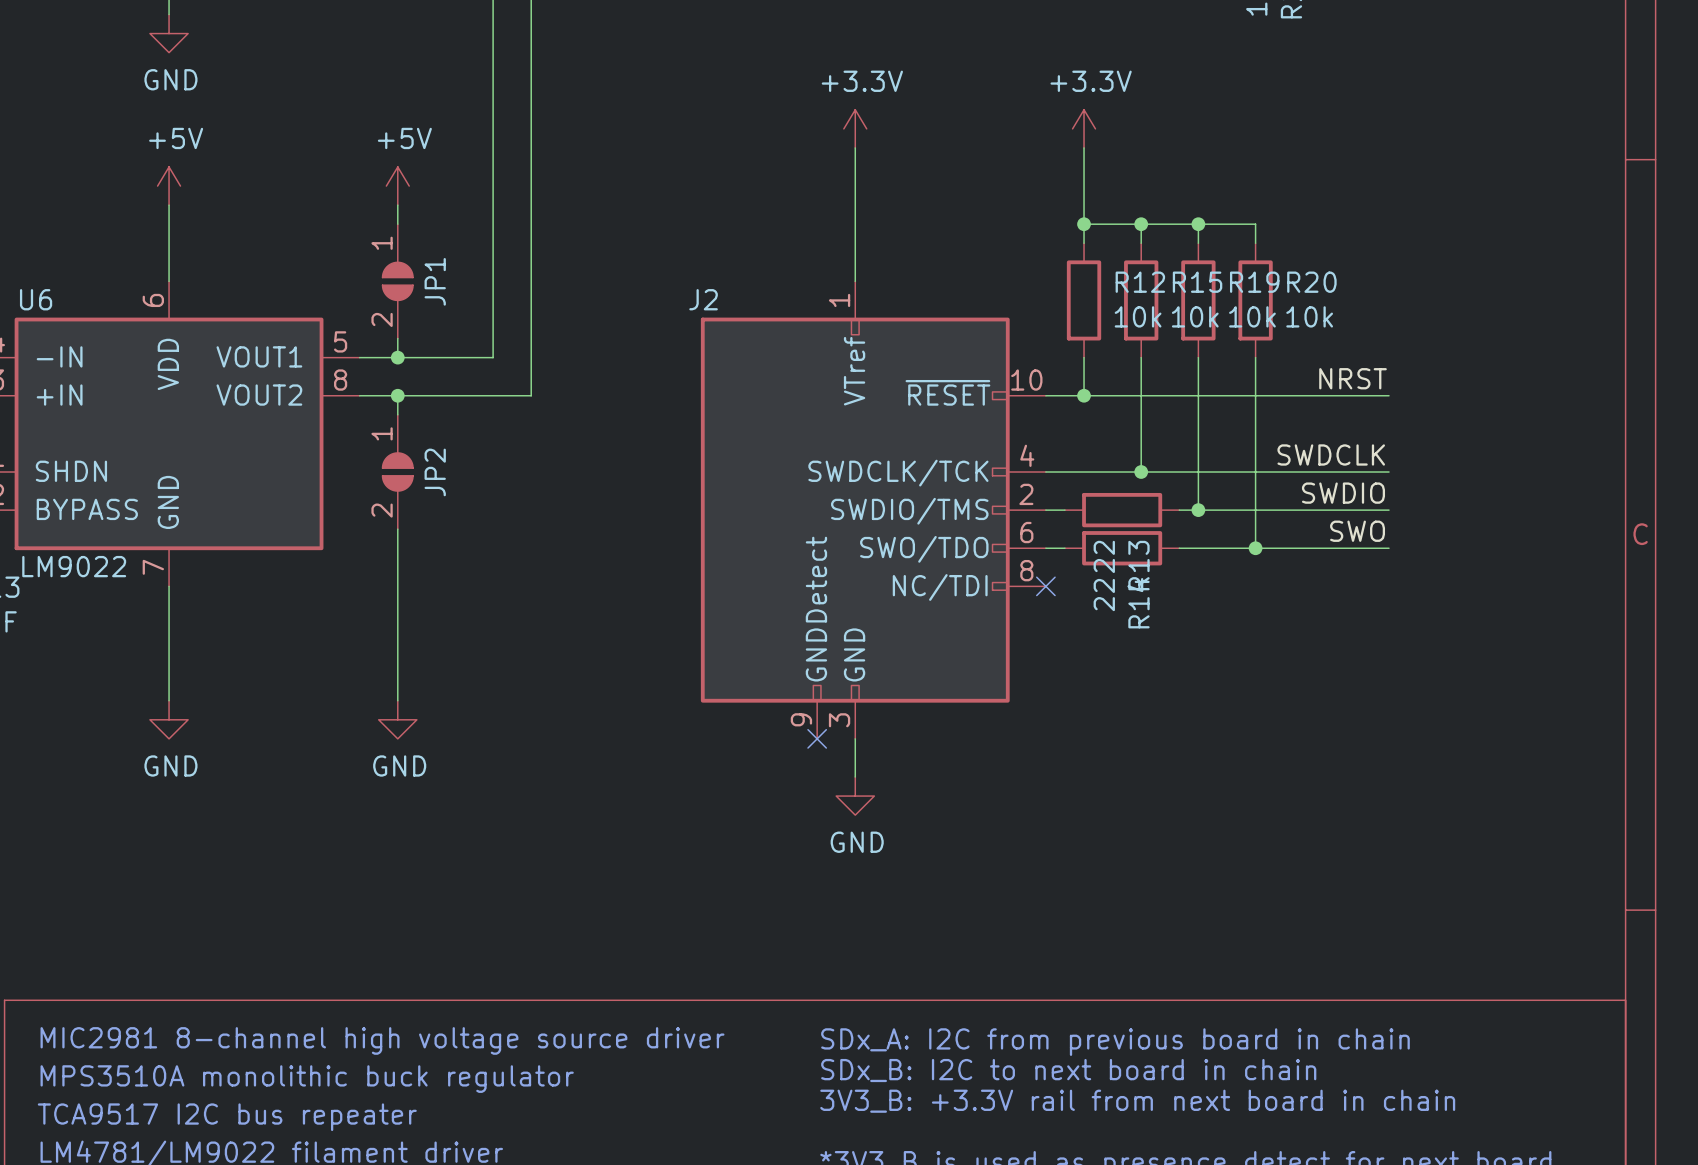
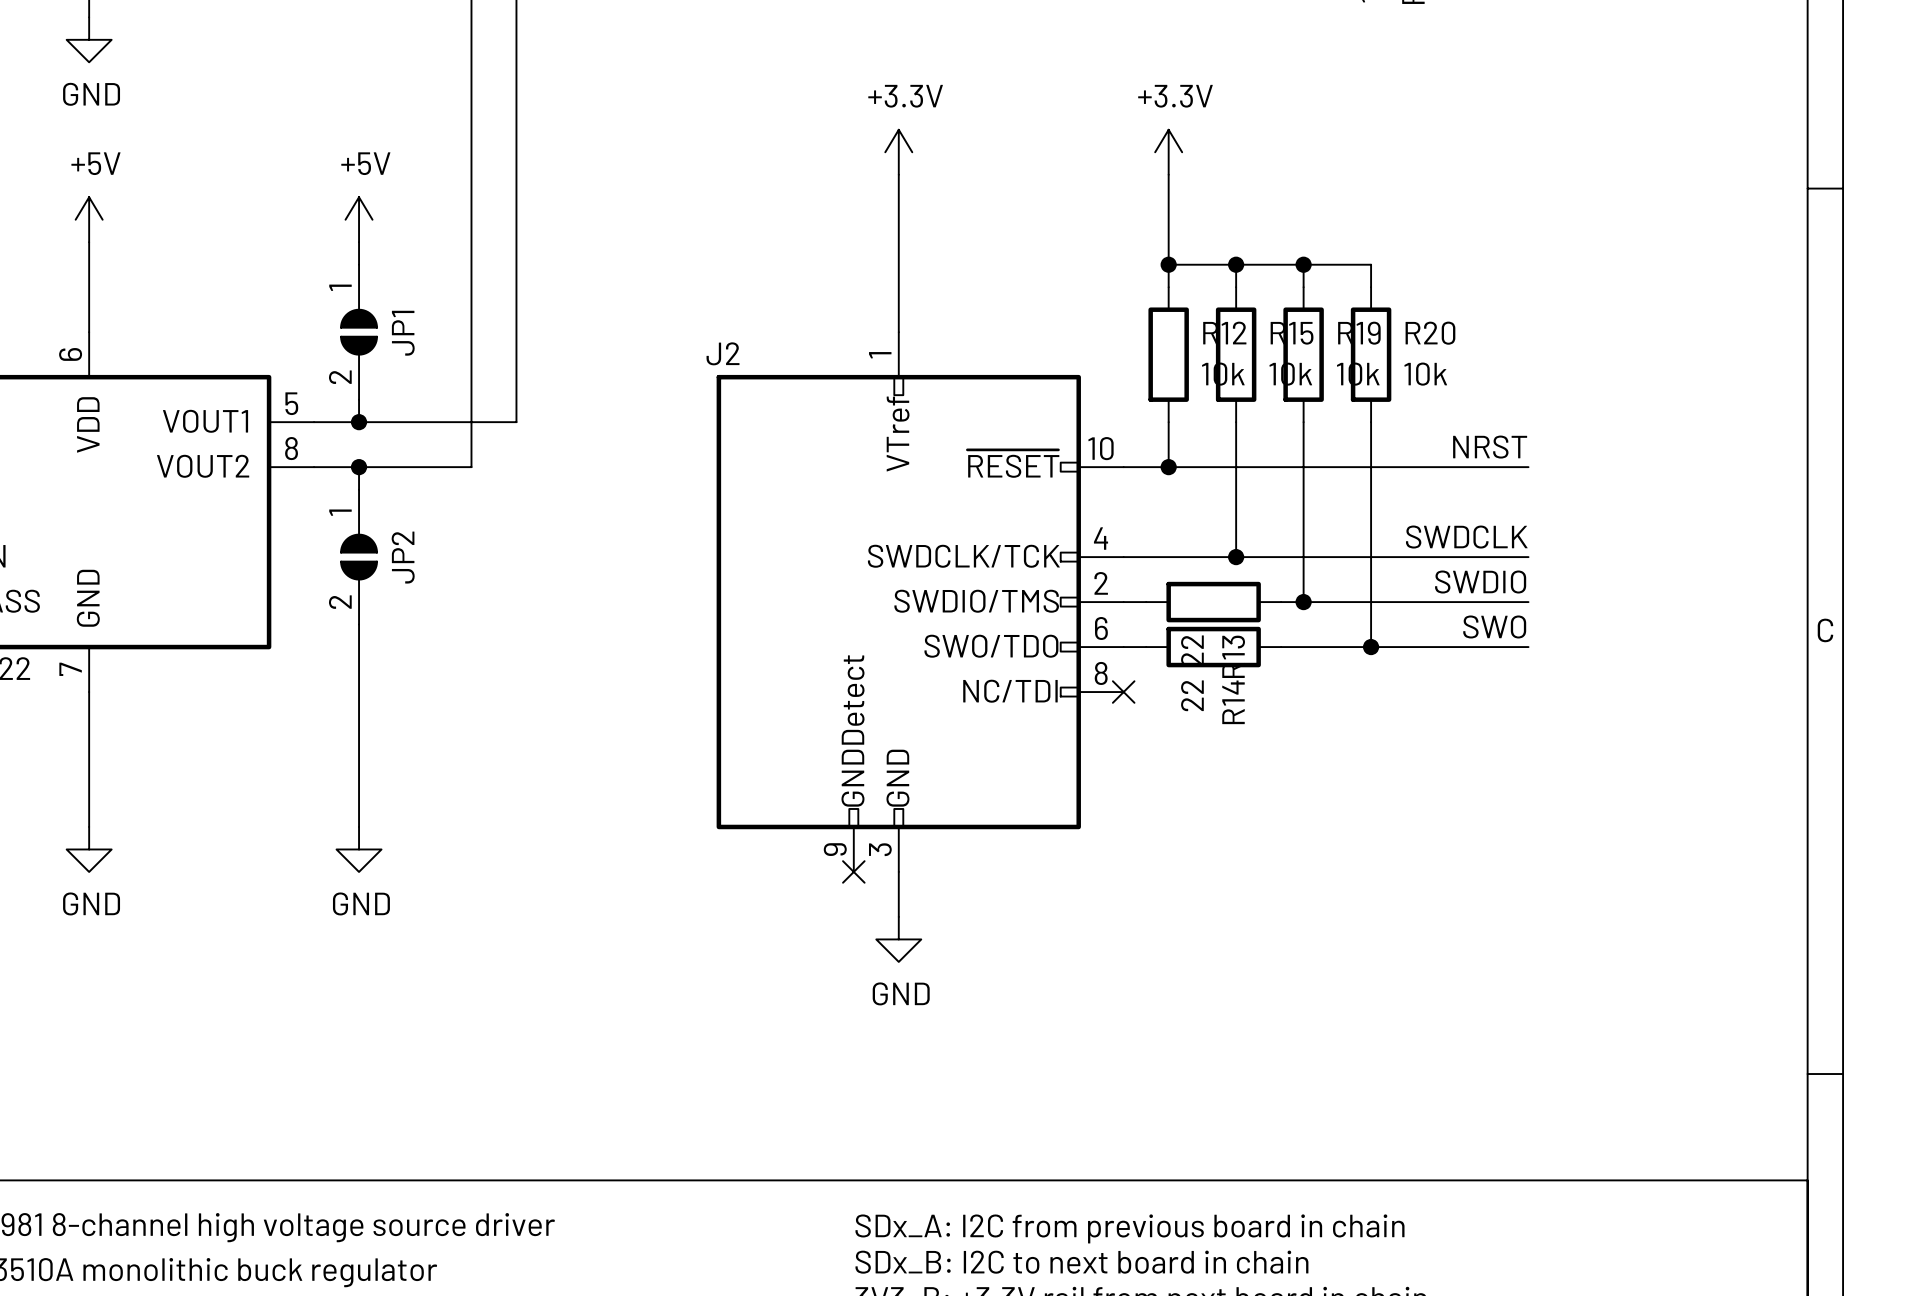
wire: (531, 357) (531, 395) (493, 395) -> (516, 422) (471, 422) (471, 467)

